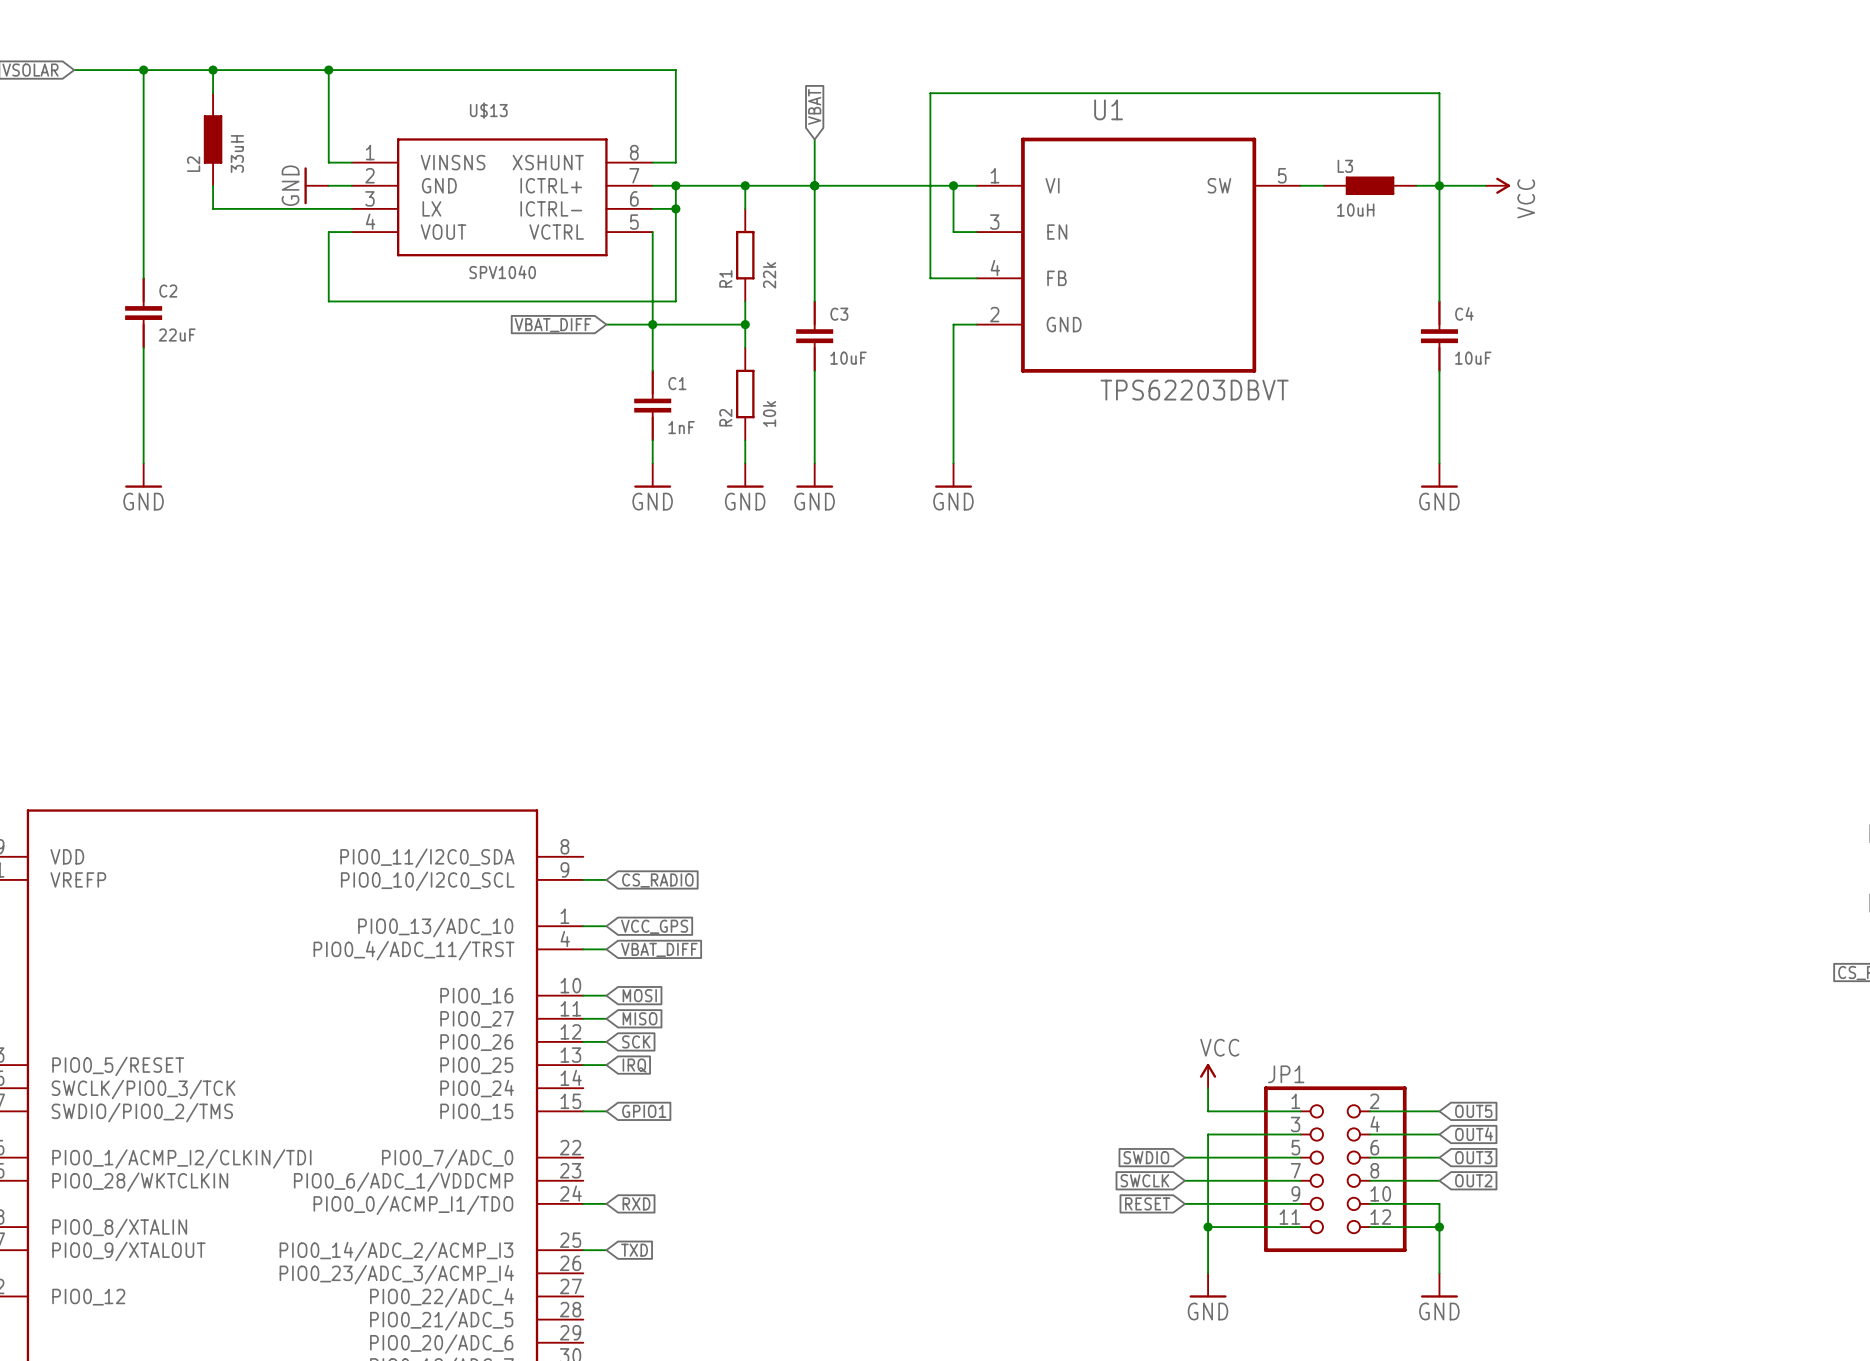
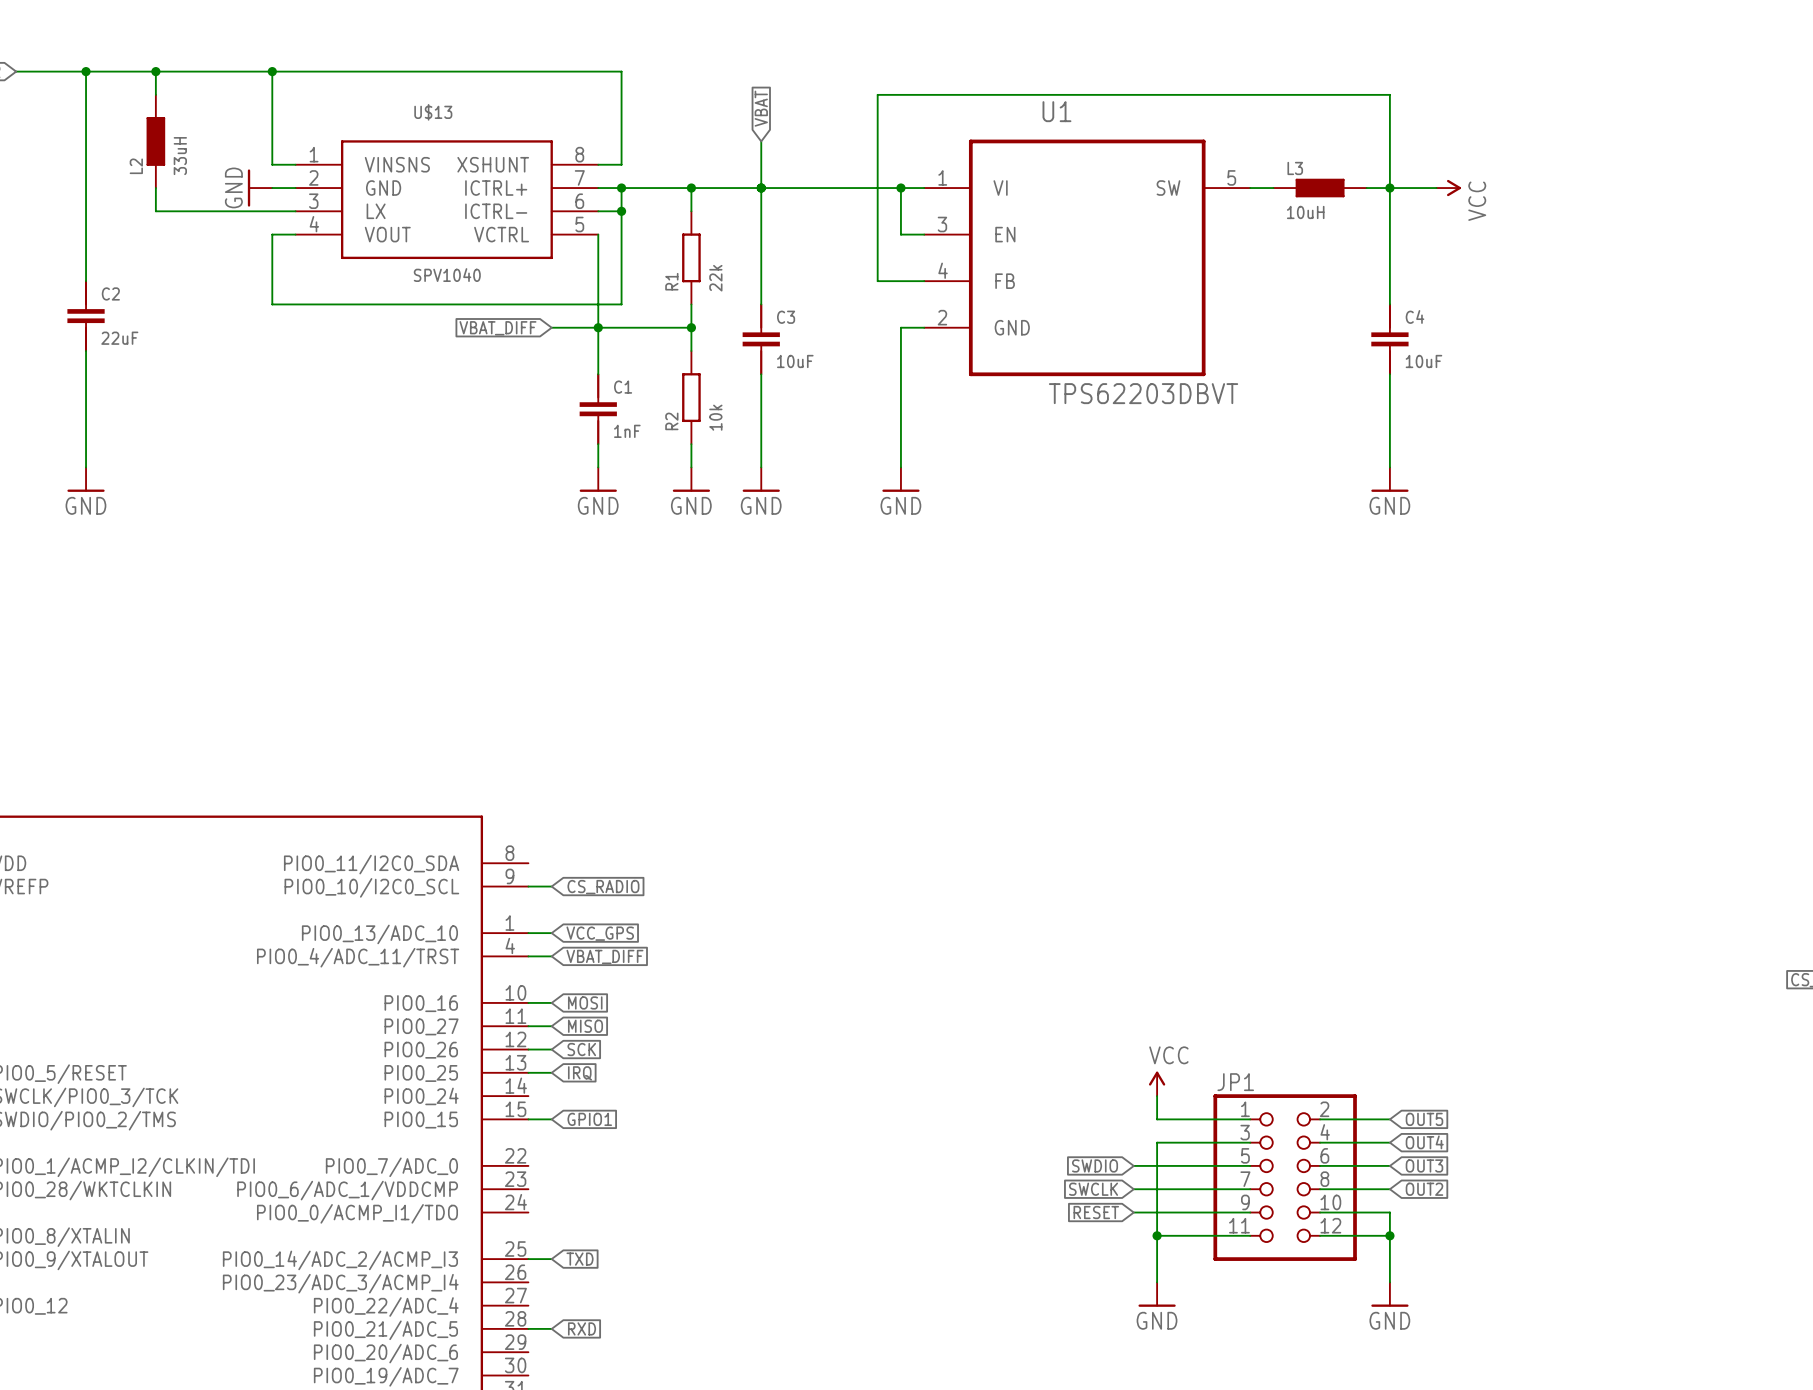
wire: (583, 1203) (606, 1203) -> (528, 1328) (551, 1328)
global label position: RXD (636, 1203) -> RXD (582, 1328)

